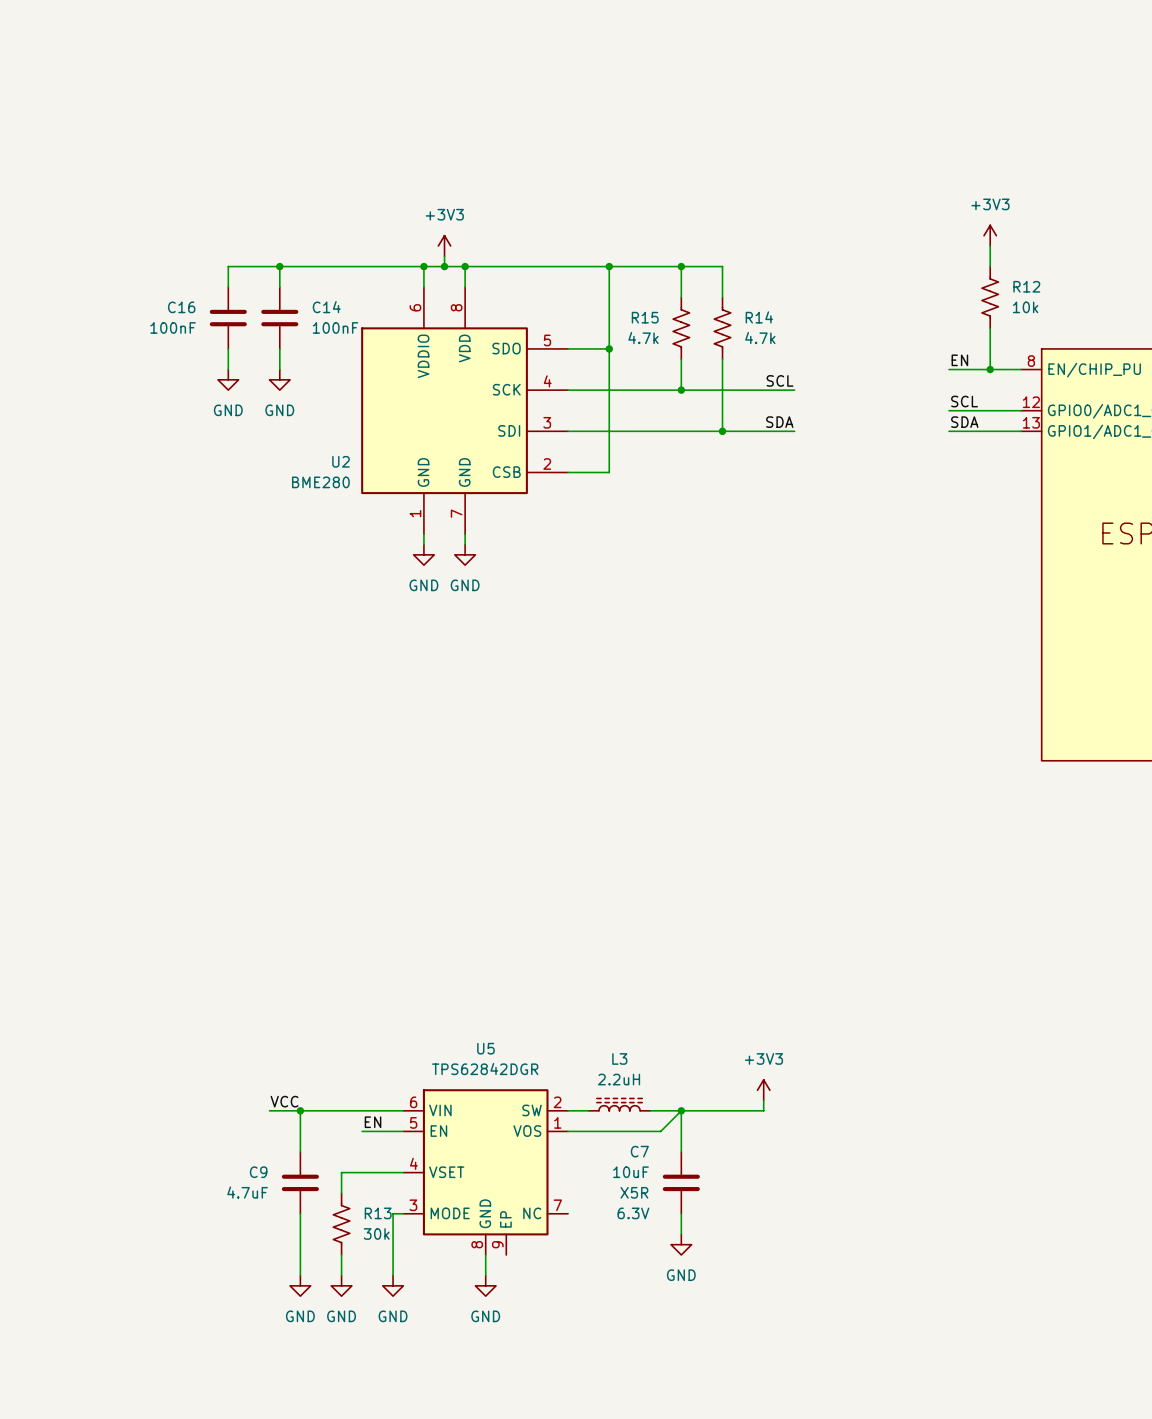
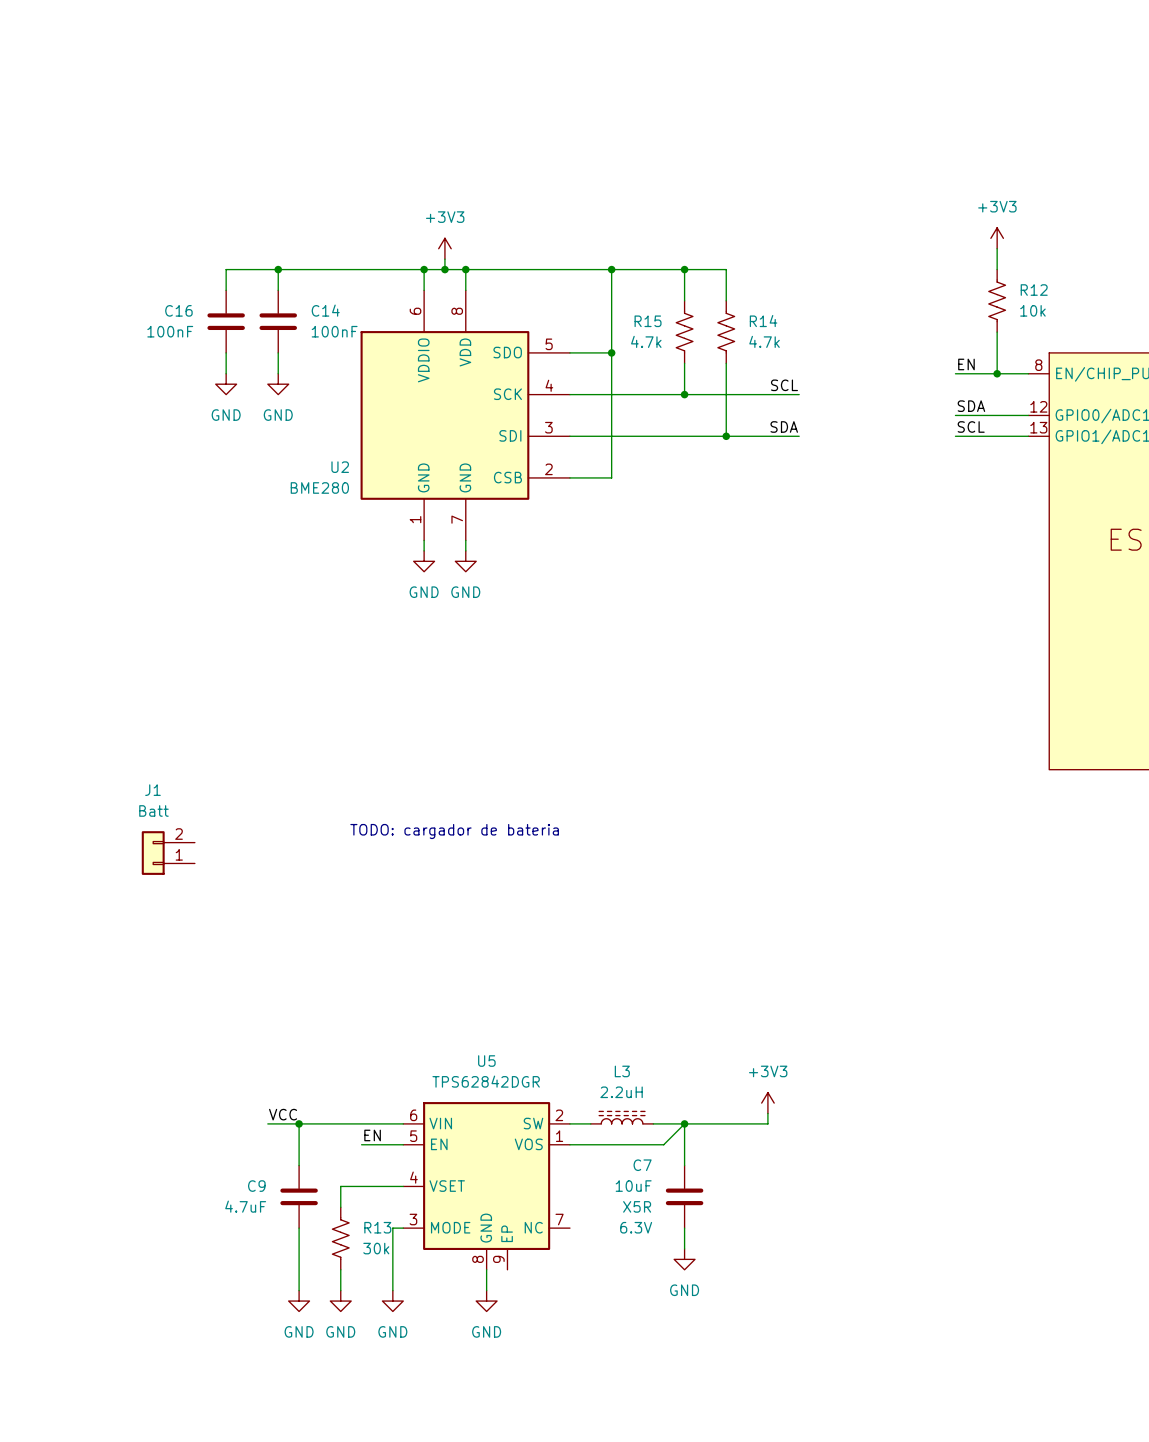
label: SCL (964, 401) -> SDA (971, 406)
label: SDA (964, 422) -> SCL (971, 426)
text: none -> TODO: cargador de bateria (454, 831)
J1: none -> Batt (168, 853)

